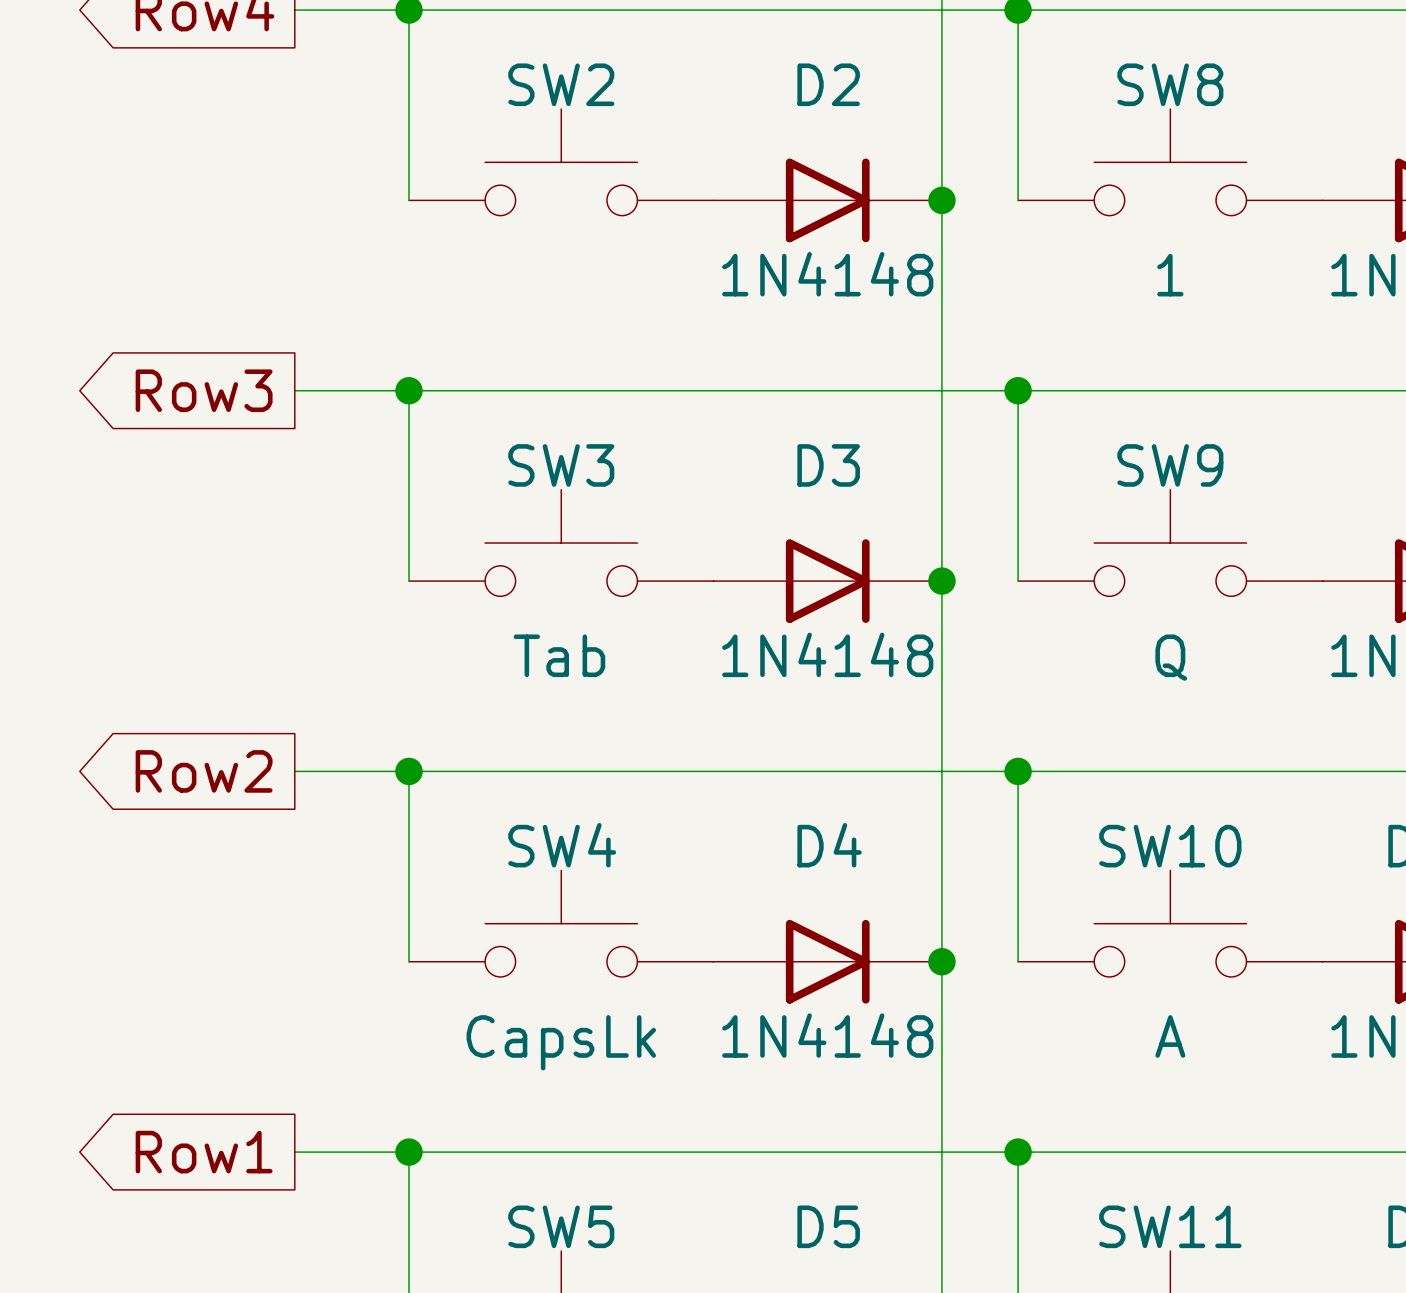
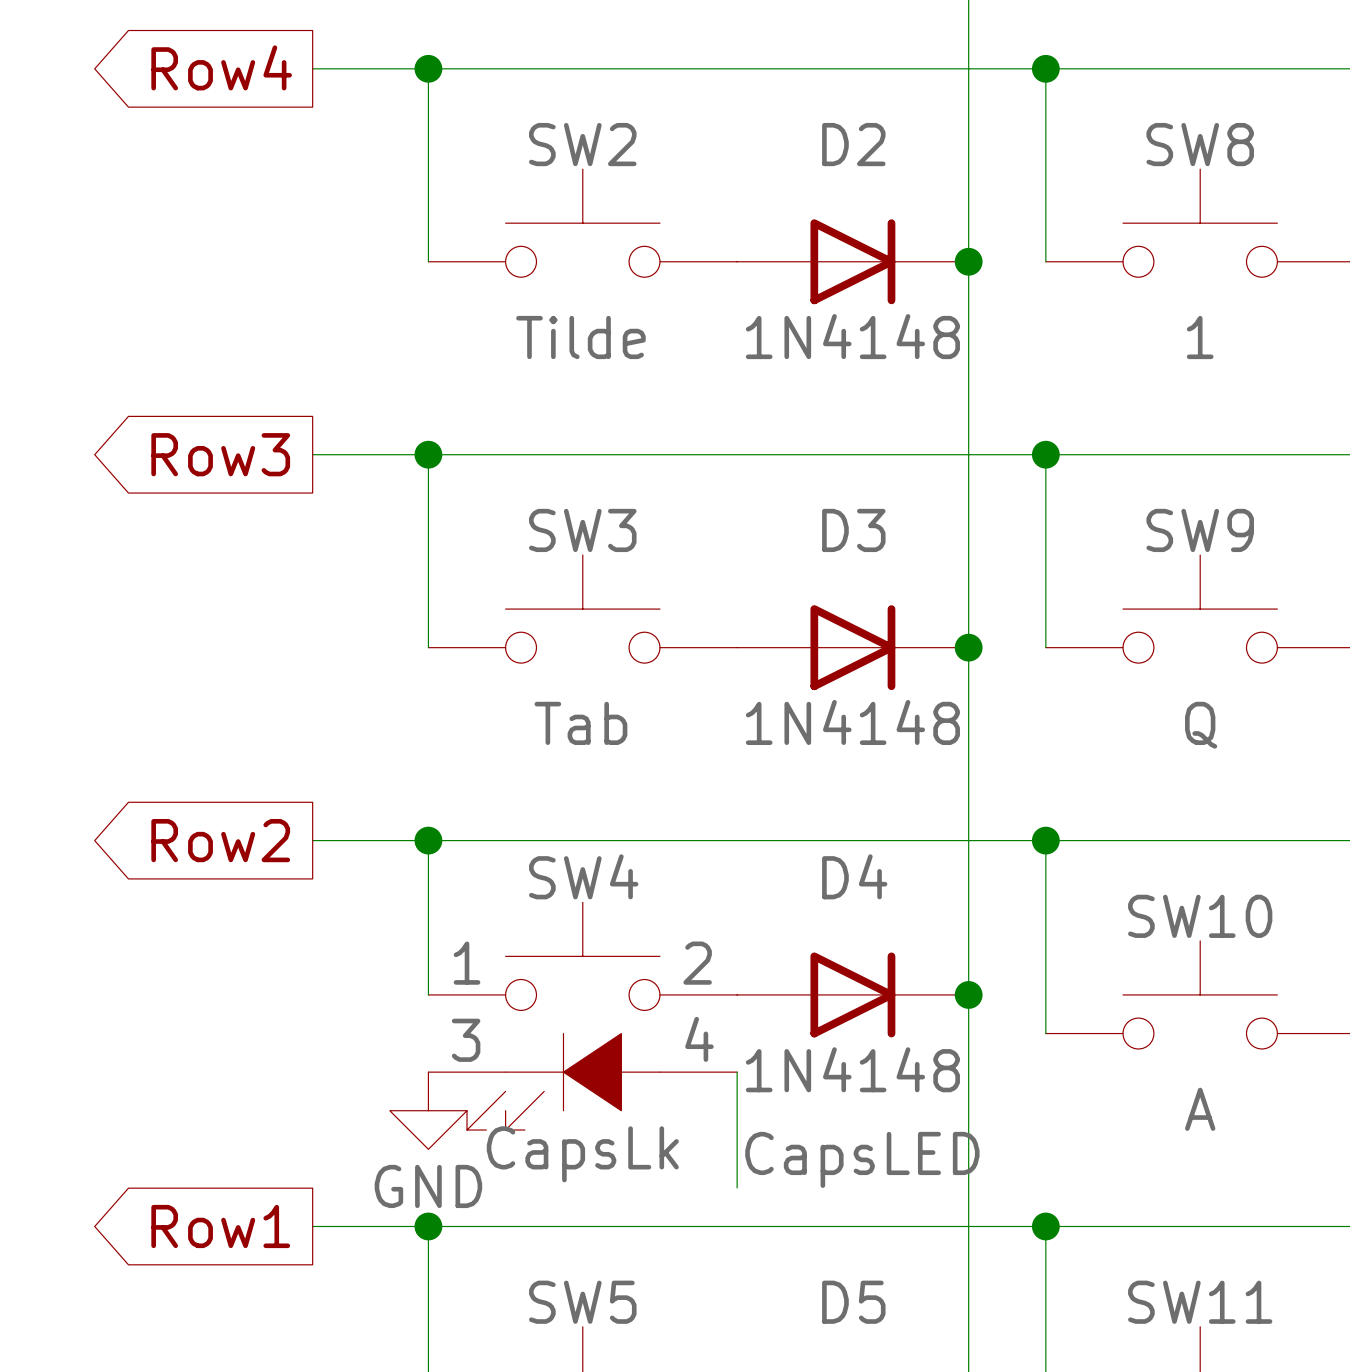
SW2 value: none -> Tilde (580, 337)
SW4 symbol: [409, 870, 714, 977] -> [428, 902, 738, 1131]
wire: (409, 923) (409, 961) -> none
D4 position: (827, 961) -> (852, 994)
junction position: (941, 961) -> (968, 994)
wire: none -> (737, 1072) (737, 1187)
power symbol: none -> GND (428, 1110)
label: none -> CapsLED (862, 1159)

